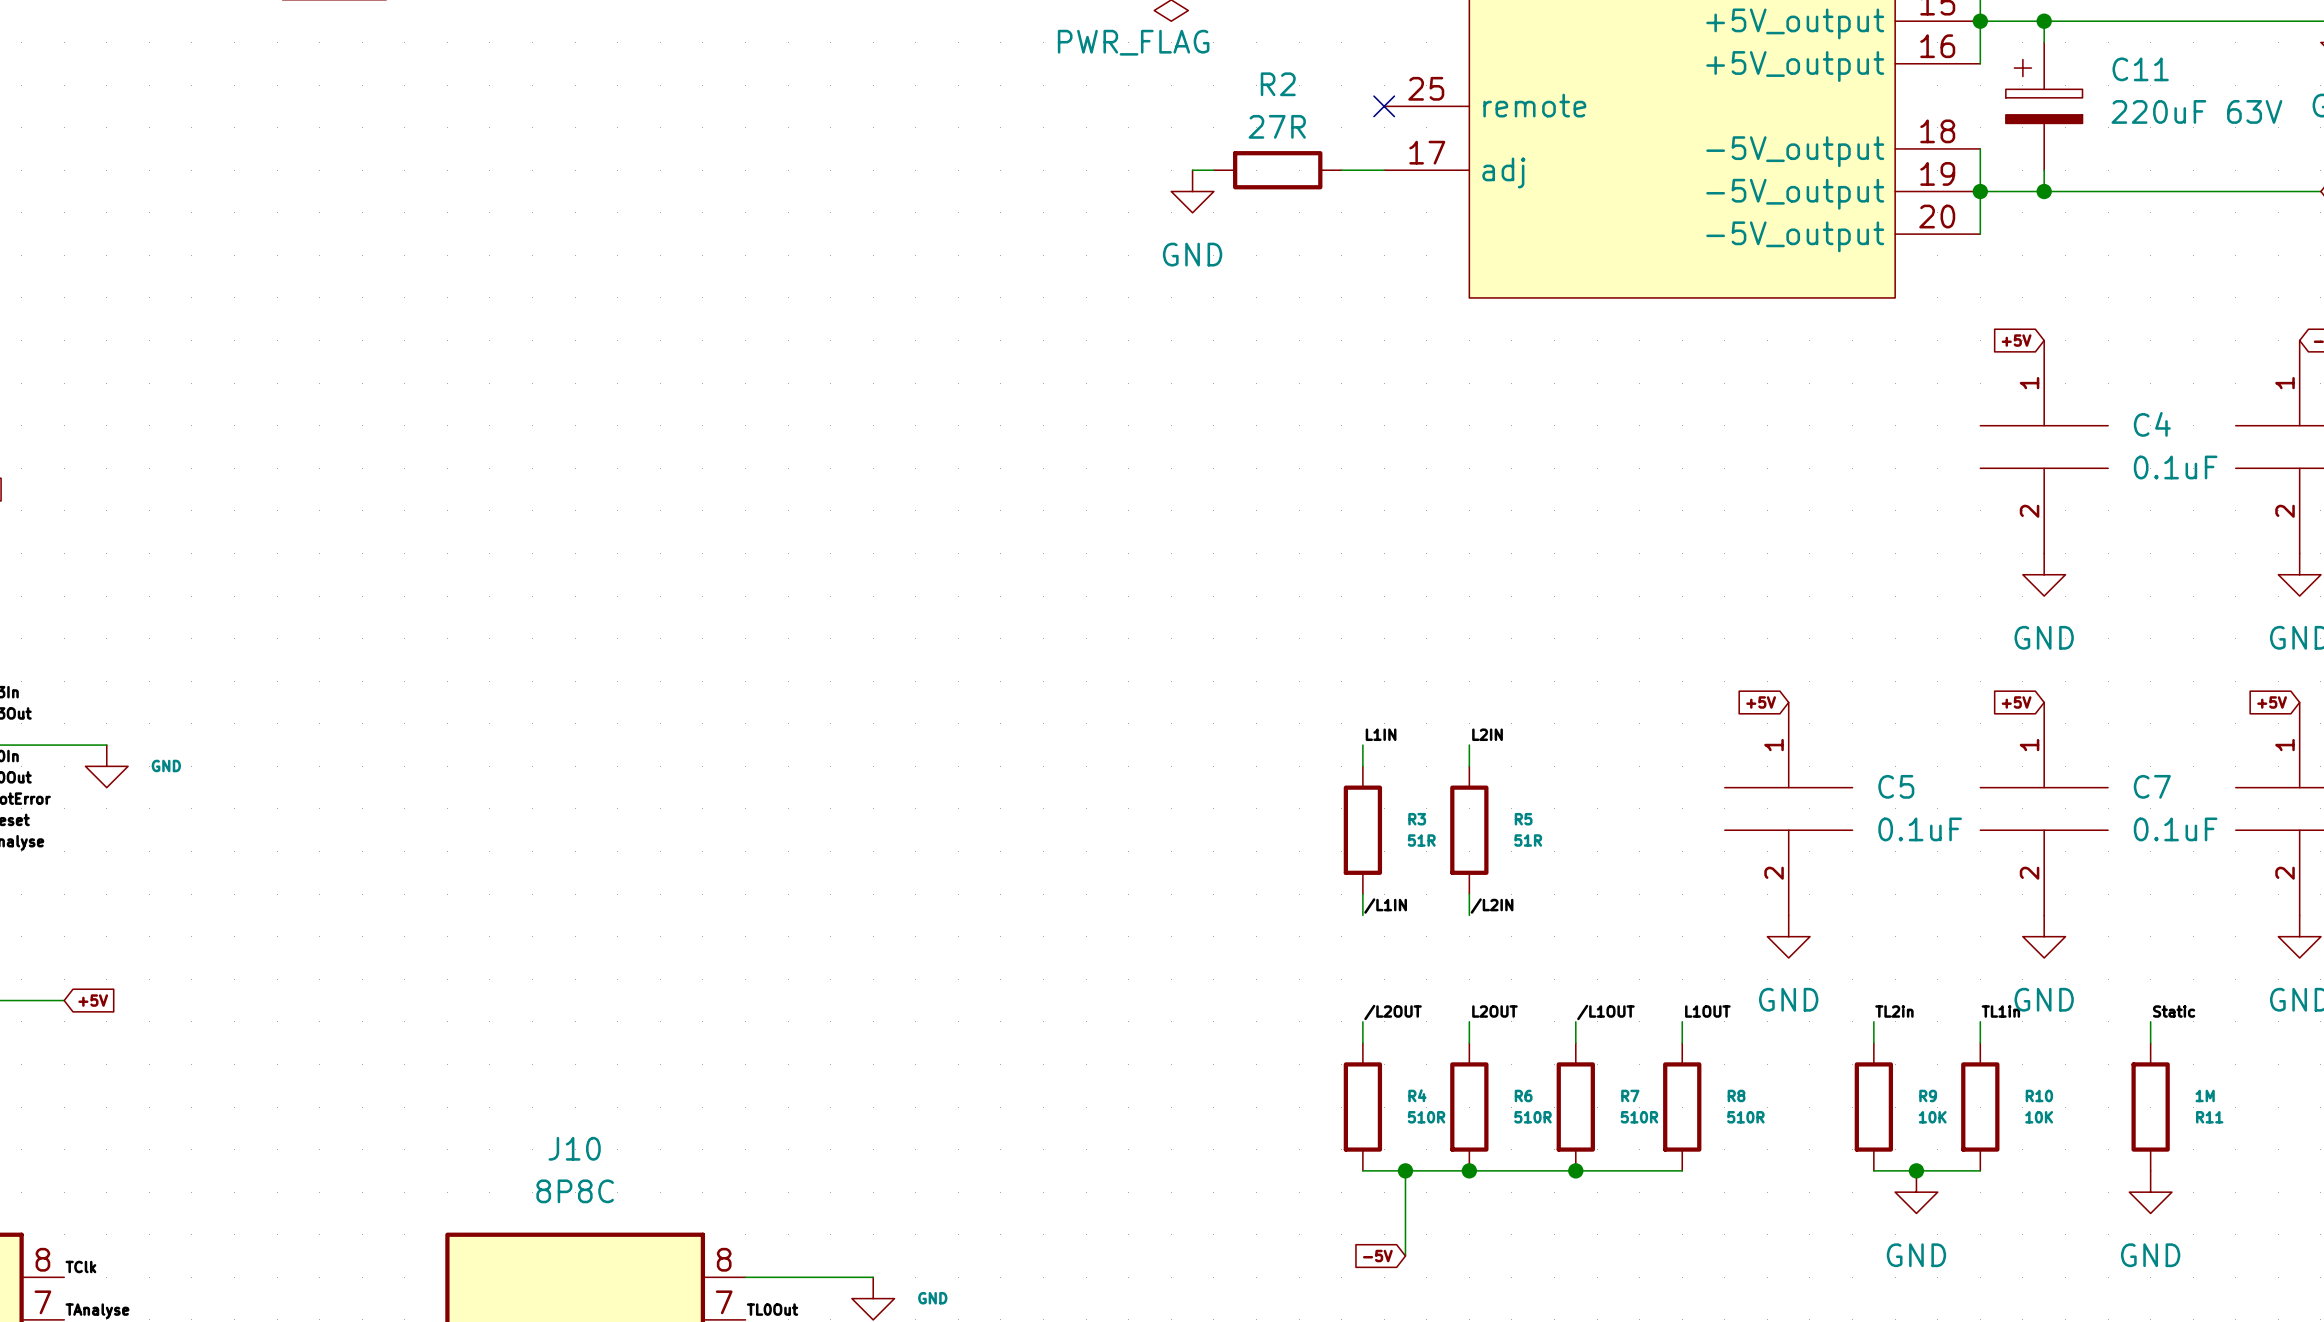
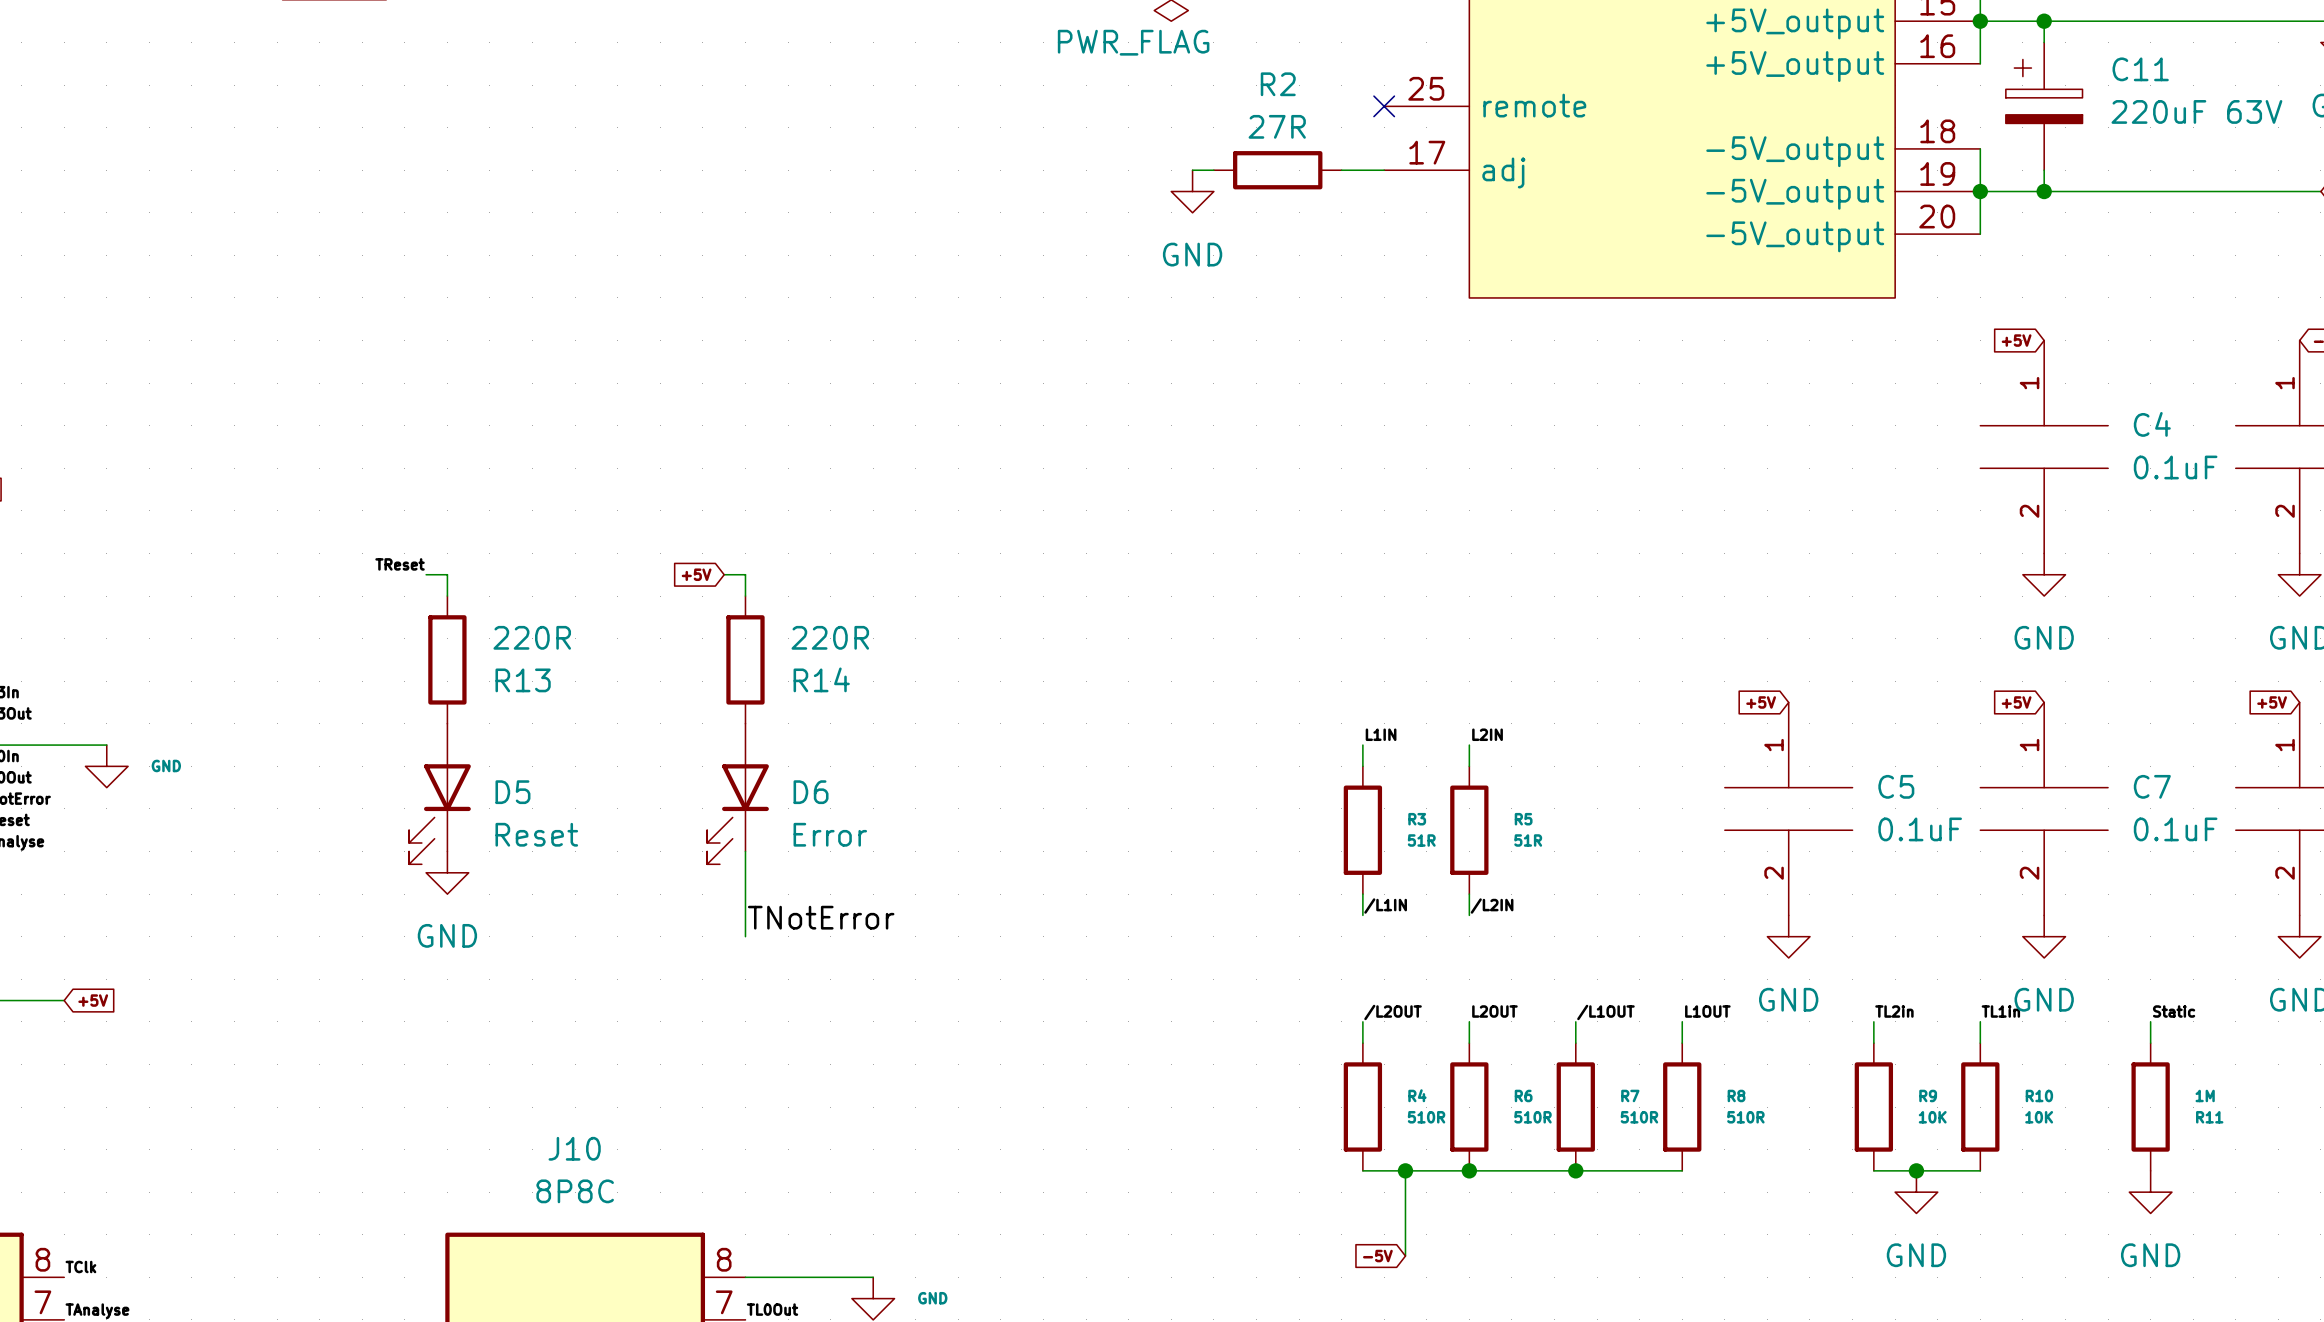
label: none -> TReset (400, 564)
wire: none -> (426, 574) (447, 574) (447, 596)
global label: none -> +5V (696, 574)
wire: none -> (724, 574) (745, 574) (745, 596)
R13: none -> 220R (447, 659)
R14: none -> 220R (745, 659)
D5: none -> Reset (439, 794)
D6: none -> Error (738, 794)
wire: none -> (745, 851) (745, 936)
power symbol: none -> GND (447, 872)
label: none -> TNotError (821, 917)

